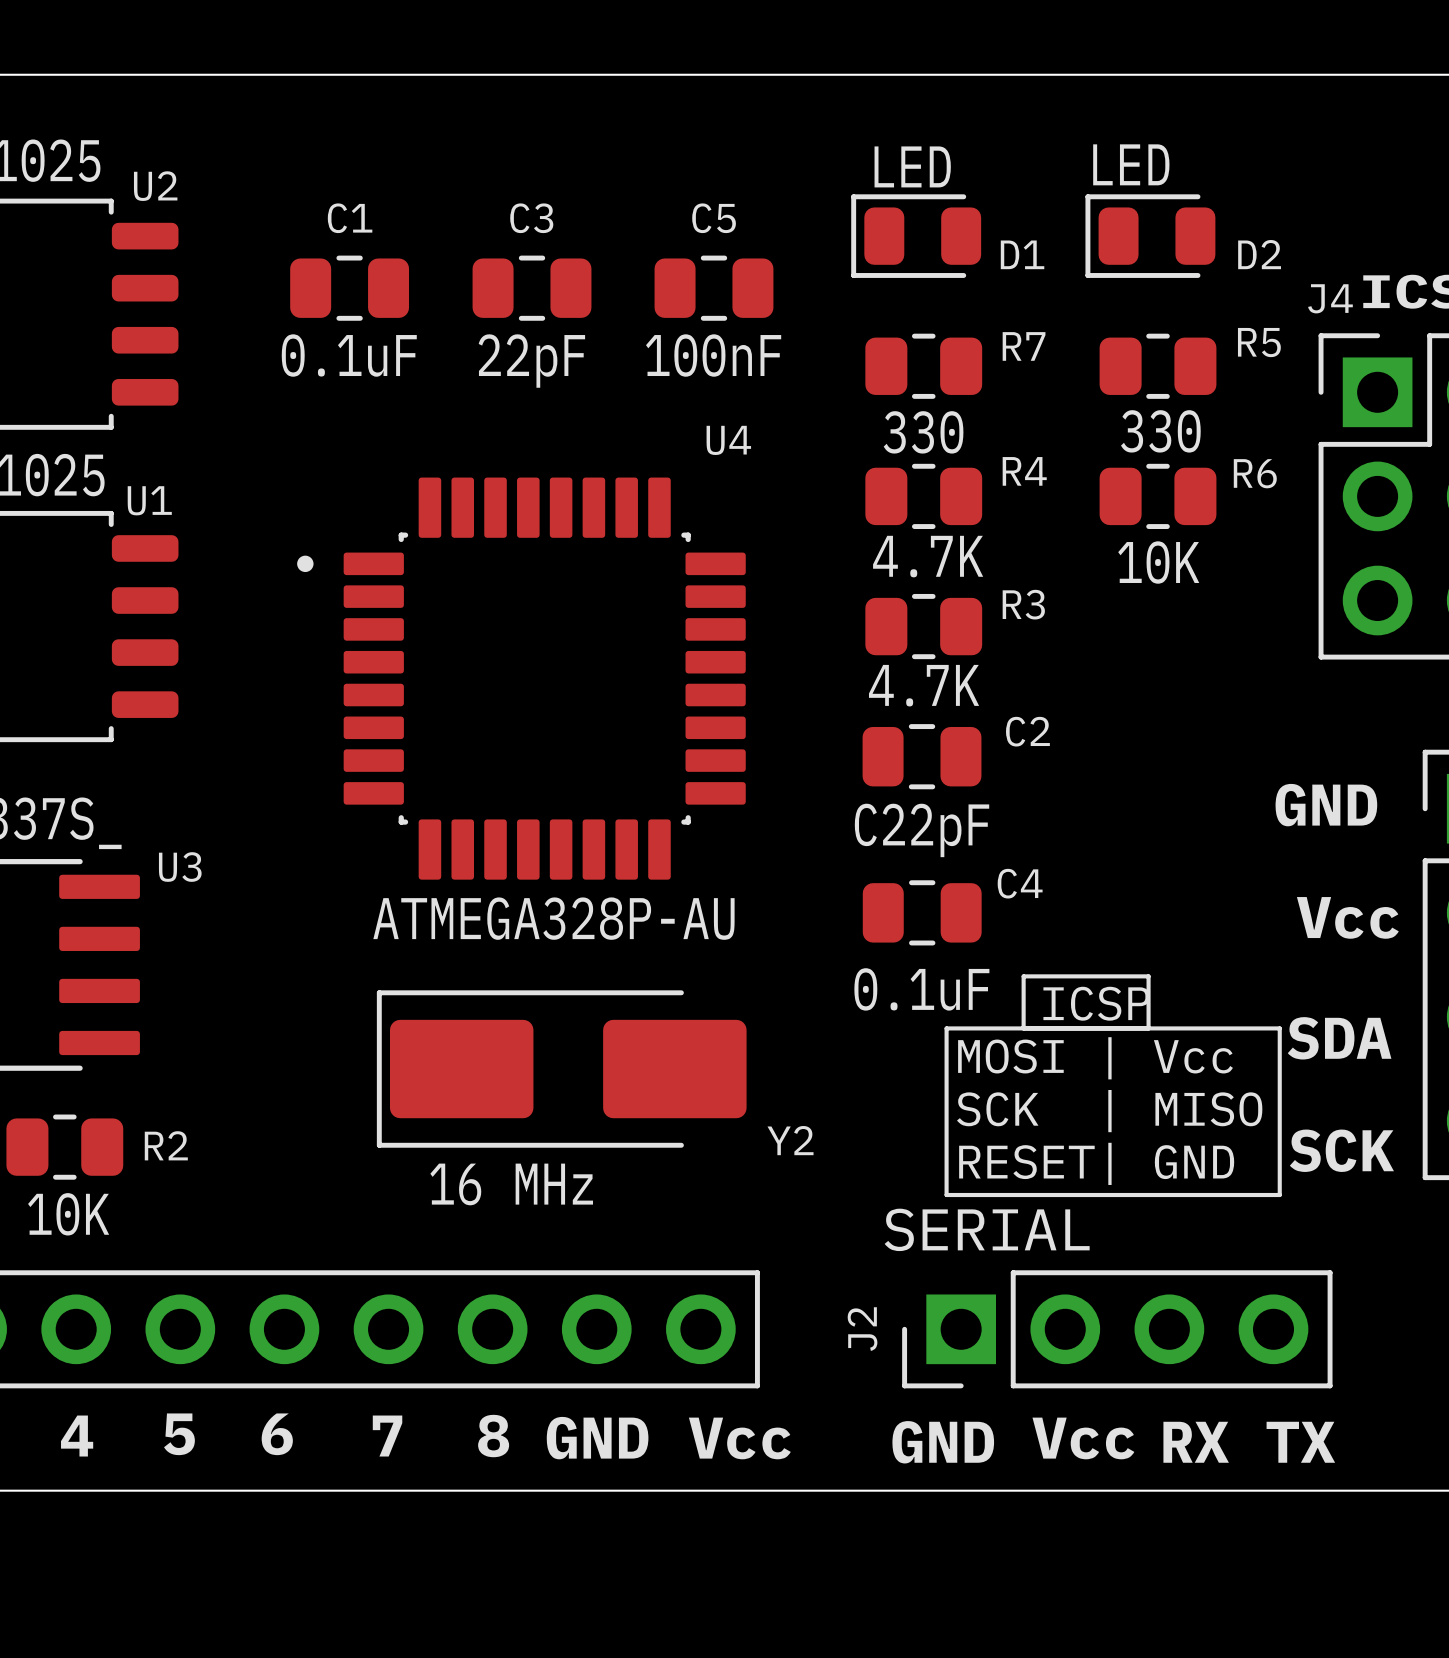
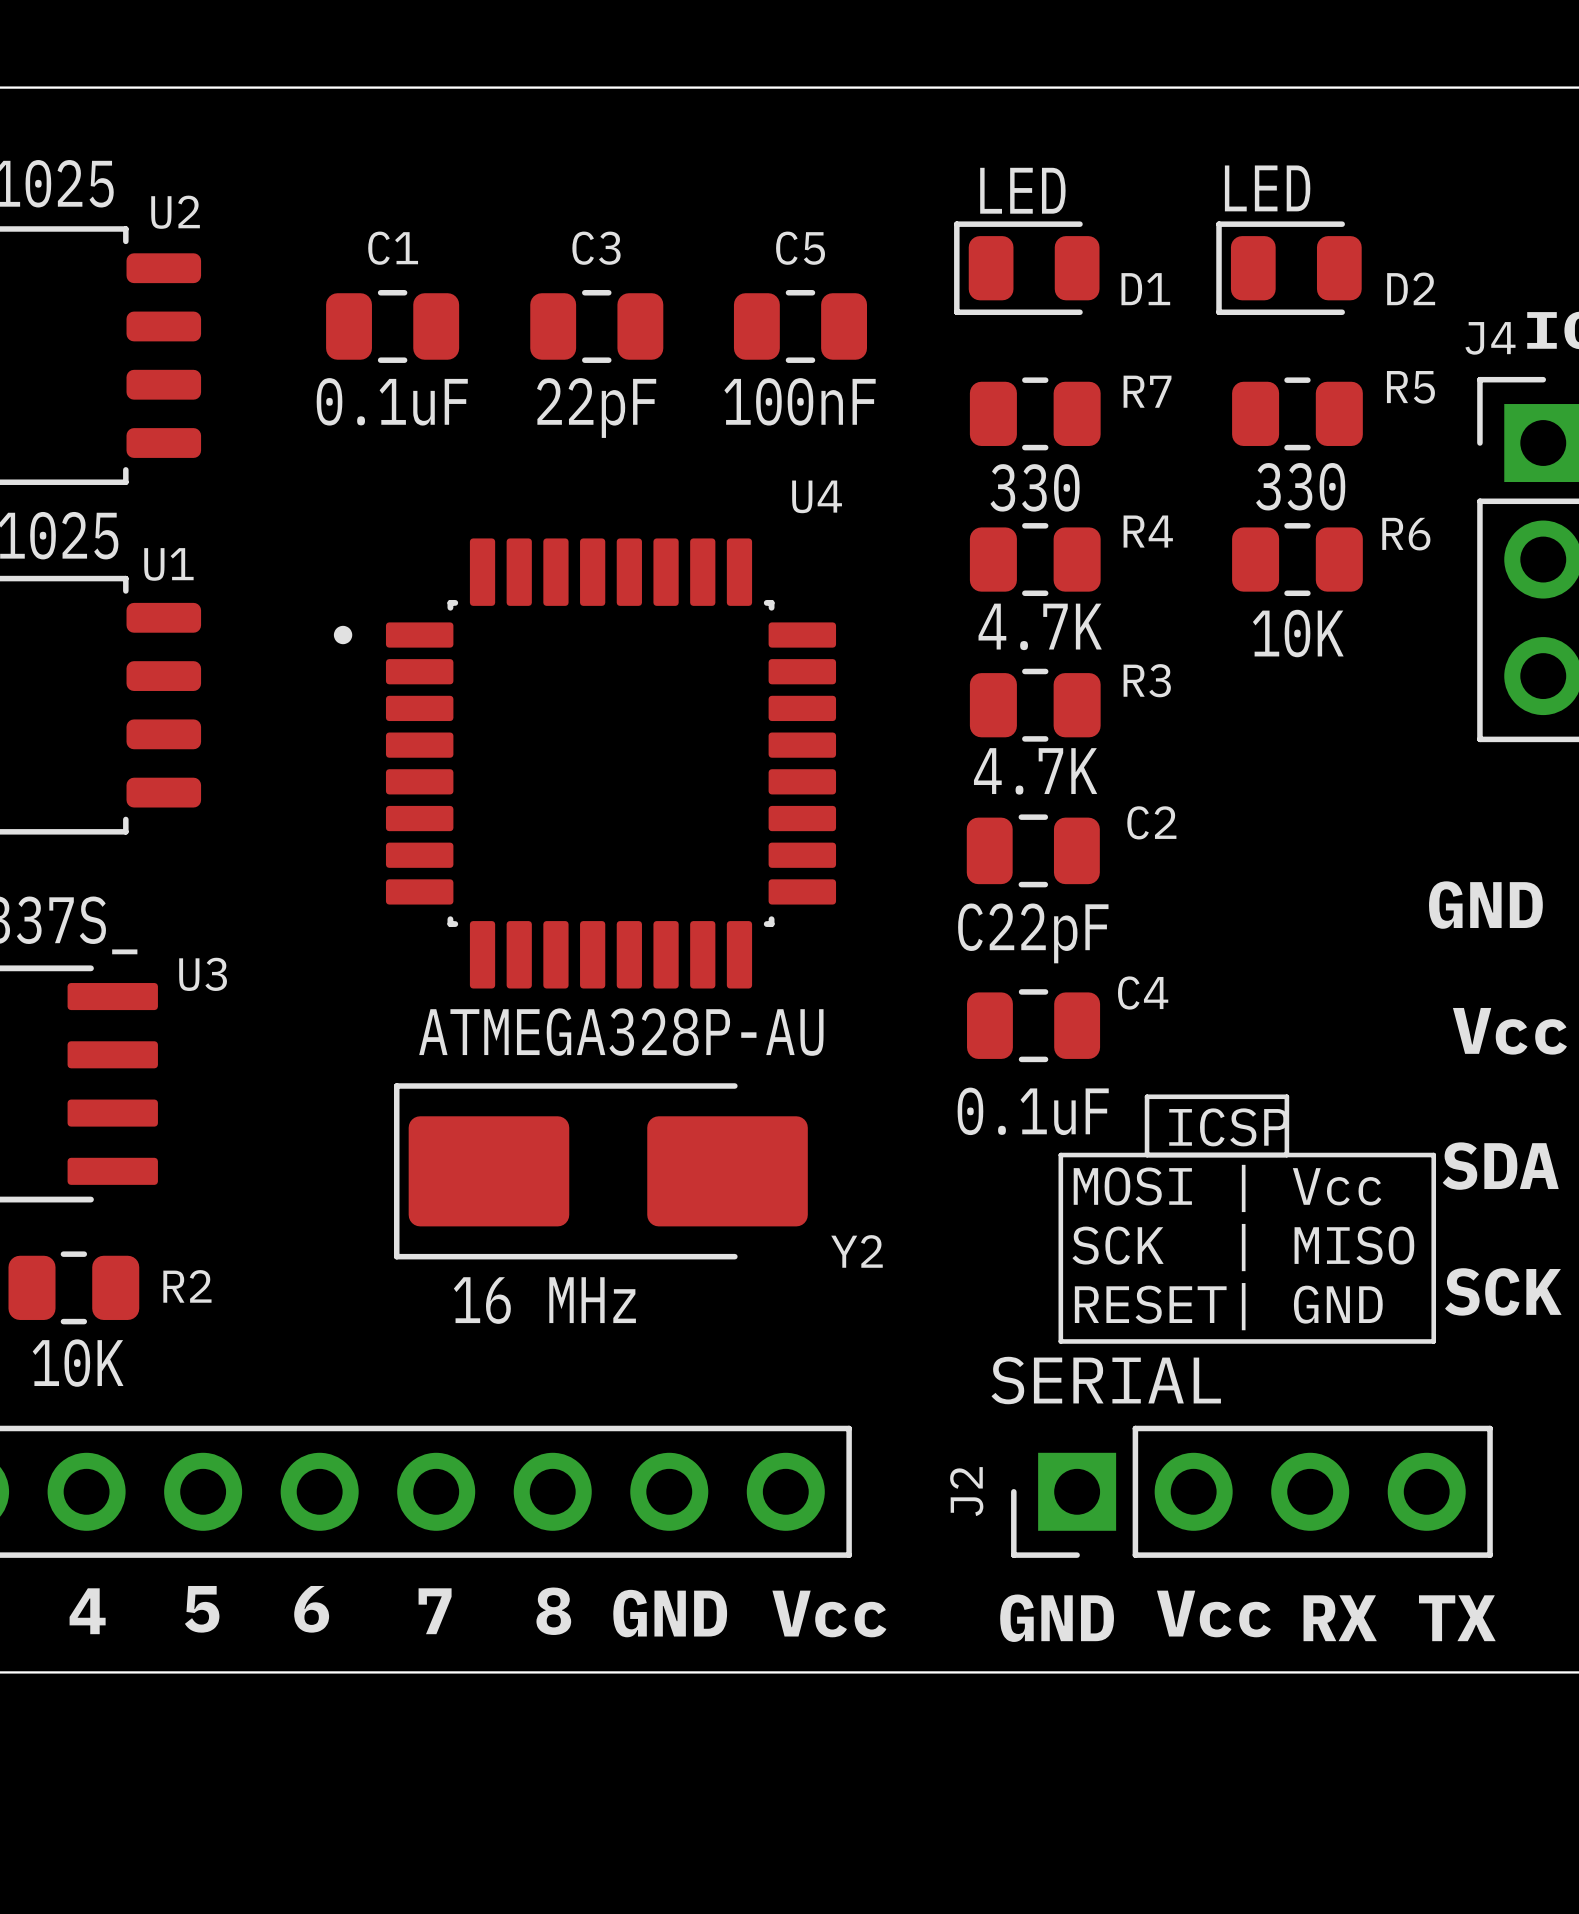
Y2 position: (561, 1069) -> (600, 1171)

